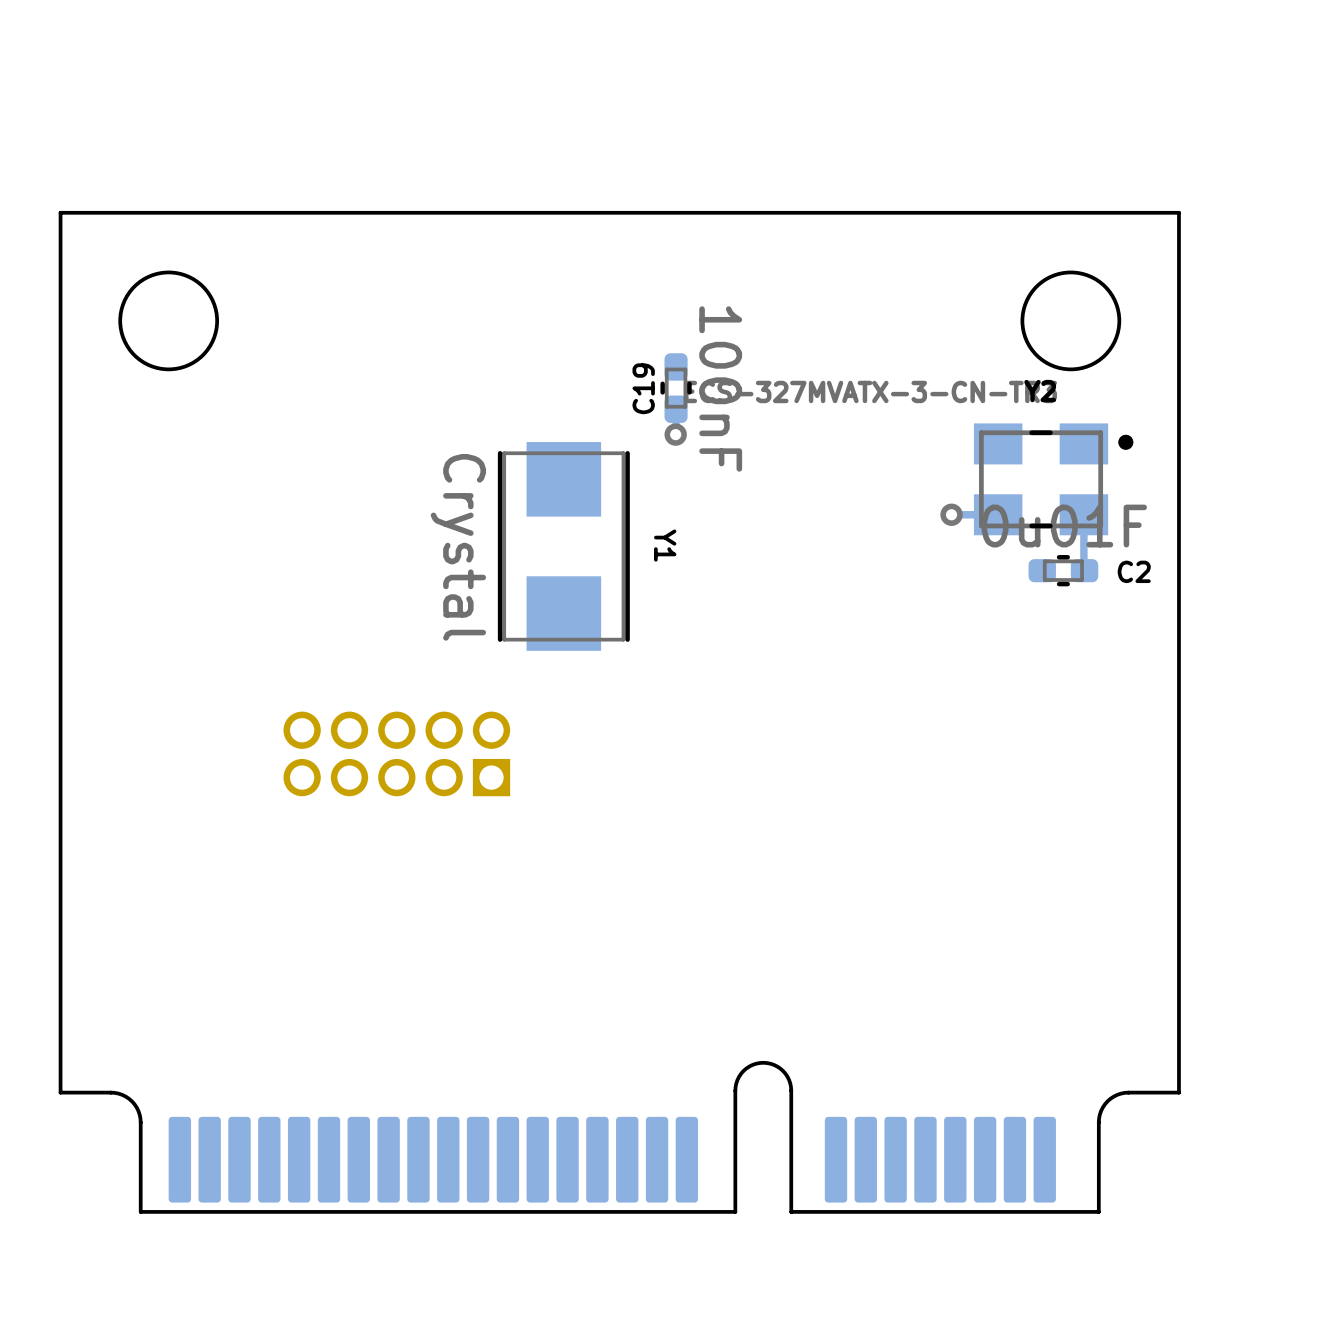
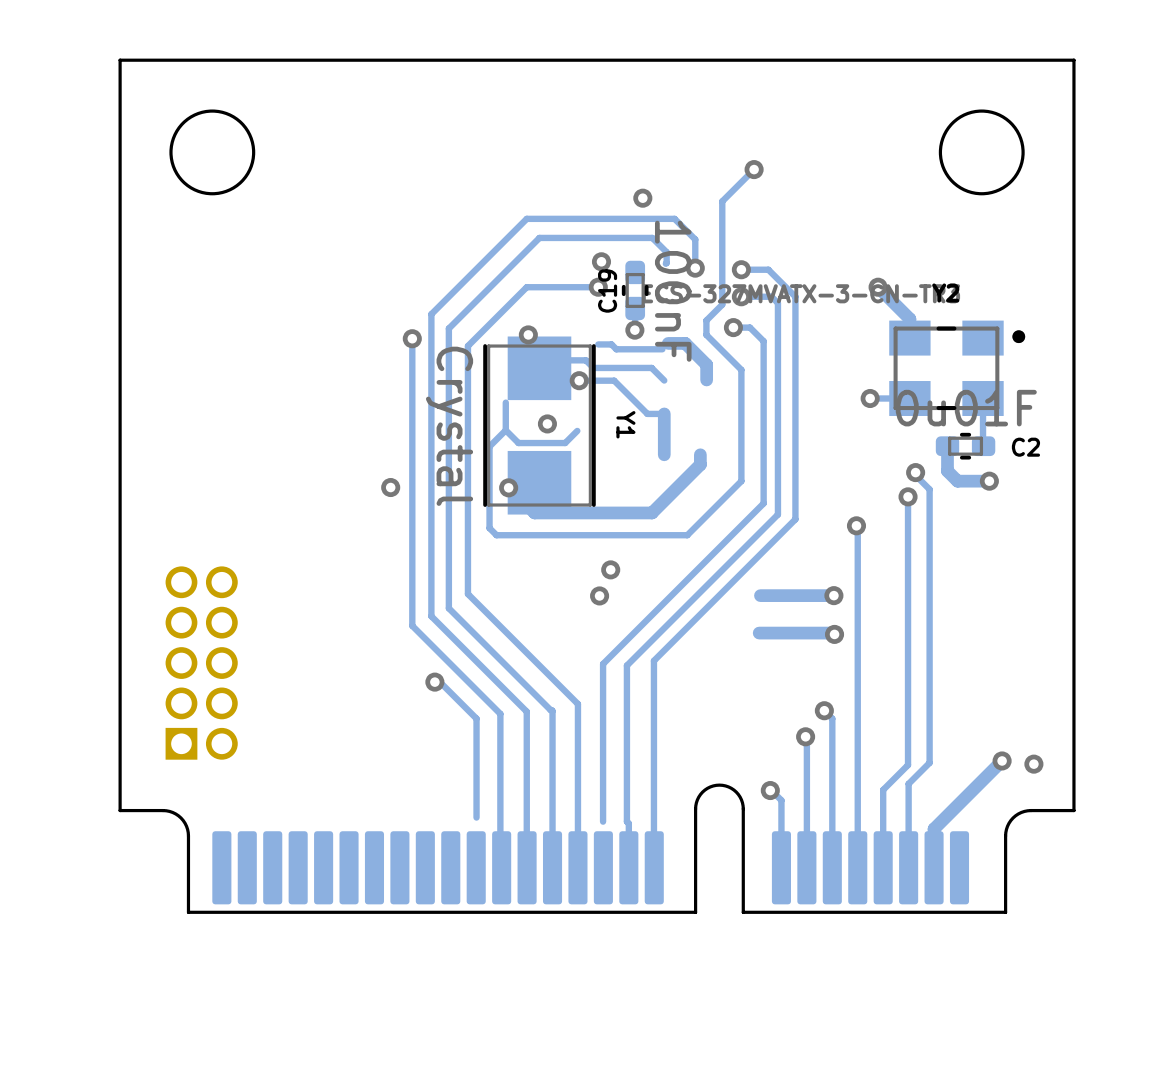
track: none -> (754, 169) (722, 201) (722, 304) (706, 320) (706, 334) (741, 369) (741, 481) (687, 535) (496, 535) (489, 528) (489, 446) (505, 430)
via: none -> (754, 169)
via: none -> (642, 198)
via: none -> (601, 261)
track: none -> (665, 263) (666, 252) (652, 237) (539, 237) (448, 328) (448, 608) (552, 711) (552, 867)
track: none -> (695, 268) (695, 239) (674, 218) (526, 218) (431, 314) (431, 616) (526, 711) (526, 867)
via: none -> (695, 268)
track: none -> (741, 269) (768, 269) (795, 296) (795, 519) (653, 660) (653, 867)
via: none -> (741, 269)
track: none -> (598, 287) (526, 287) (467, 346) (467, 594) (577, 704) (577, 867)
via: none -> (598, 287)
track: none -> (878, 287) (909, 319) (909, 338)
via: none -> (878, 287)
track: none -> (741, 296) (771, 296) (777, 303) (777, 514) (626, 665) (628, 867)
via: none -> (741, 296)
track: none -> (733, 327) (749, 327) (763, 341) (763, 503) (603, 663) (603, 821)
via: none -> (733, 327)
via: none -> (528, 334)
track: none -> (412, 338) (412, 625) (500, 713) (500, 866)
via: none -> (412, 338)
track: none -> (668, 343) (685, 343) (706, 364) (706, 379)
track: none -> (598, 344) (611, 344) (616, 349) (662, 349)
track: none -> (553, 360) (585, 360) (593, 367) (651, 367) (664, 380)
track: none -> (579, 380) (614, 380) (647, 413) (664, 413) (664, 454)
via: none -> (579, 380)
track: none -> (505, 402) (505, 430)
via: none -> (547, 423)
track: none -> (505, 430) (518, 443) (565, 443) (577, 430)
track: none -> (947, 446) (947, 471) (957, 481) (989, 481)
track: none -> (700, 454) (700, 464) (652, 512) (534, 512) (508, 487)
track: none -> (915, 472) (912, 472) (929, 489) (929, 762) (908, 783) (908, 867)
via: none -> (915, 472)
via: none -> (989, 481)
via: none -> (390, 487)
via: none -> (508, 487)
track: none -> (908, 496) (908, 765) (883, 789) (883, 867)
via: none -> (908, 496)
track: none -> (856, 525) (857, 867)
via: none -> (856, 525)
part position: (619, 712) -> (597, 486)
via: none -> (610, 569)
track: none -> (833, 595) (760, 595)
via: none -> (833, 595)
via: none -> (599, 595)
part rotation: 0° (396, 753) -> 90° clockwise (201, 663)
part position: (396, 753) -> (201, 663)
track: none -> (759, 633) (834, 634)
via: none -> (834, 634)
track: none -> (434, 682) (439, 682) (476, 718) (476, 817)
via: none -> (434, 682)
track: none -> (824, 710) (832, 718) (832, 867)
via: none -> (824, 710)
track: none -> (805, 736) (806, 867)
via: none -> (805, 736)
track: none -> (1002, 760) (934, 829) (934, 867)
via: none -> (1002, 760)
via: none -> (1033, 764)
track: none -> (770, 790) (781, 800) (781, 867)
via: none -> (770, 790)

